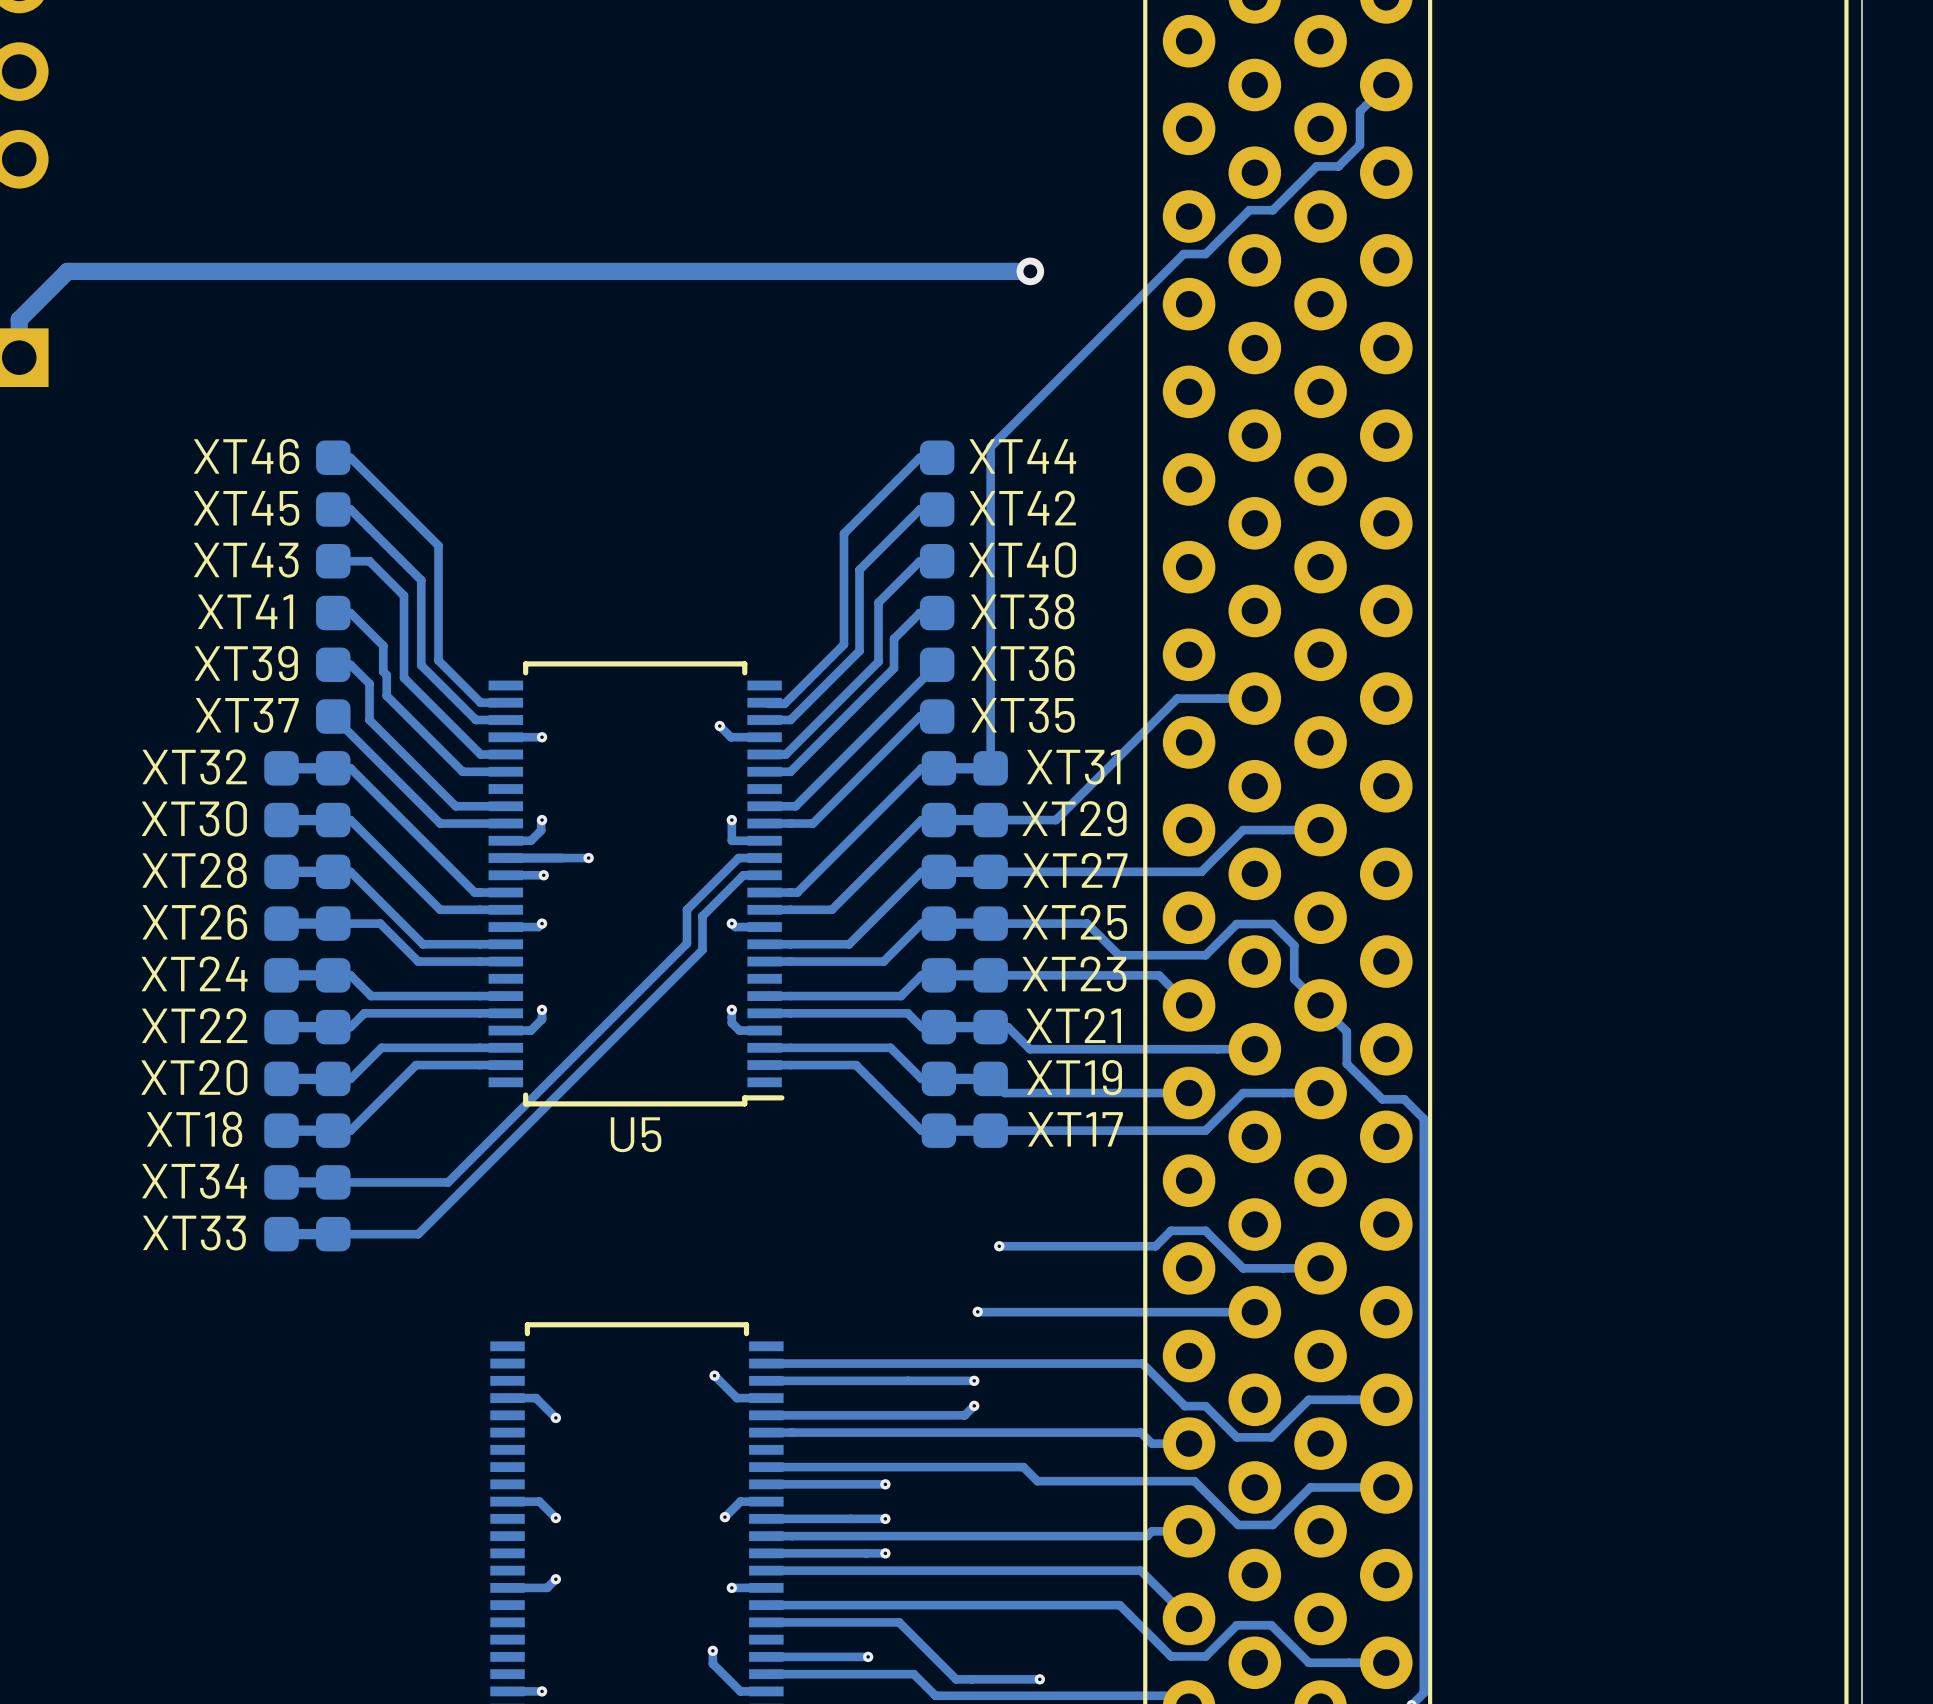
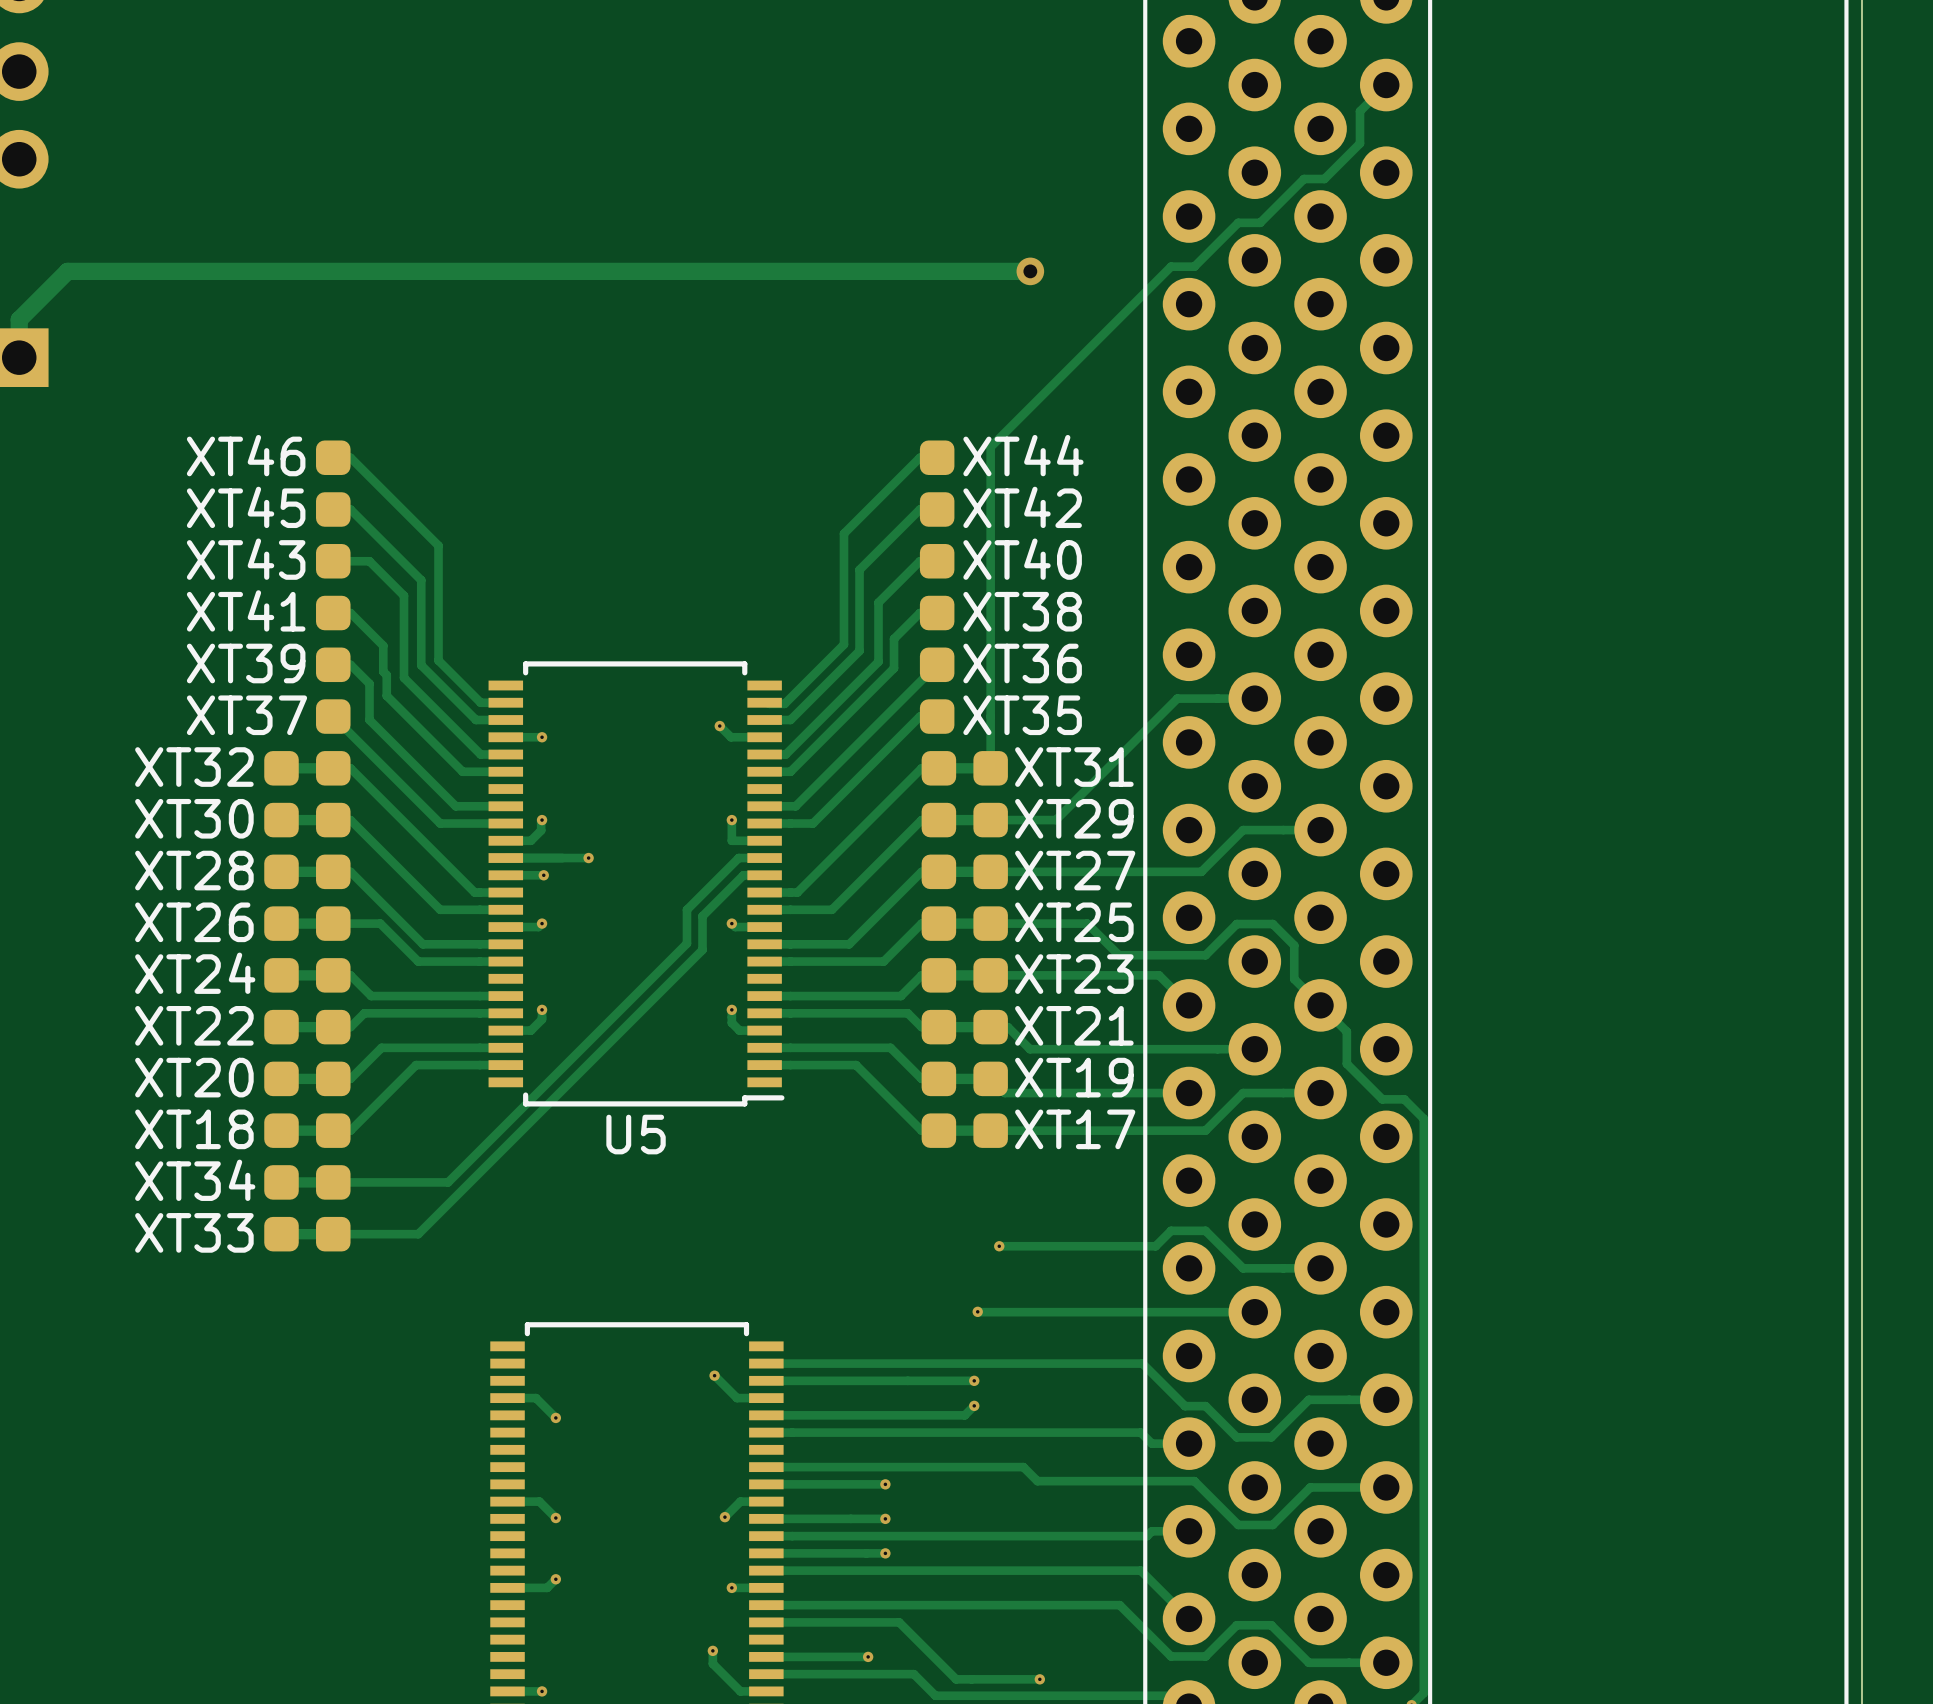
track: (1360, 143) (1338, 166) (1316, 166) (1304, 179) -> (1360, 143) (1324, 179) (1304, 179)
track: (1272, 210) (1249, 210) (1205, 254) (1183, 254) (1171, 266) -> (1272, 210) (1260, 222) (1238, 222) (1194, 266) (1171, 266)

